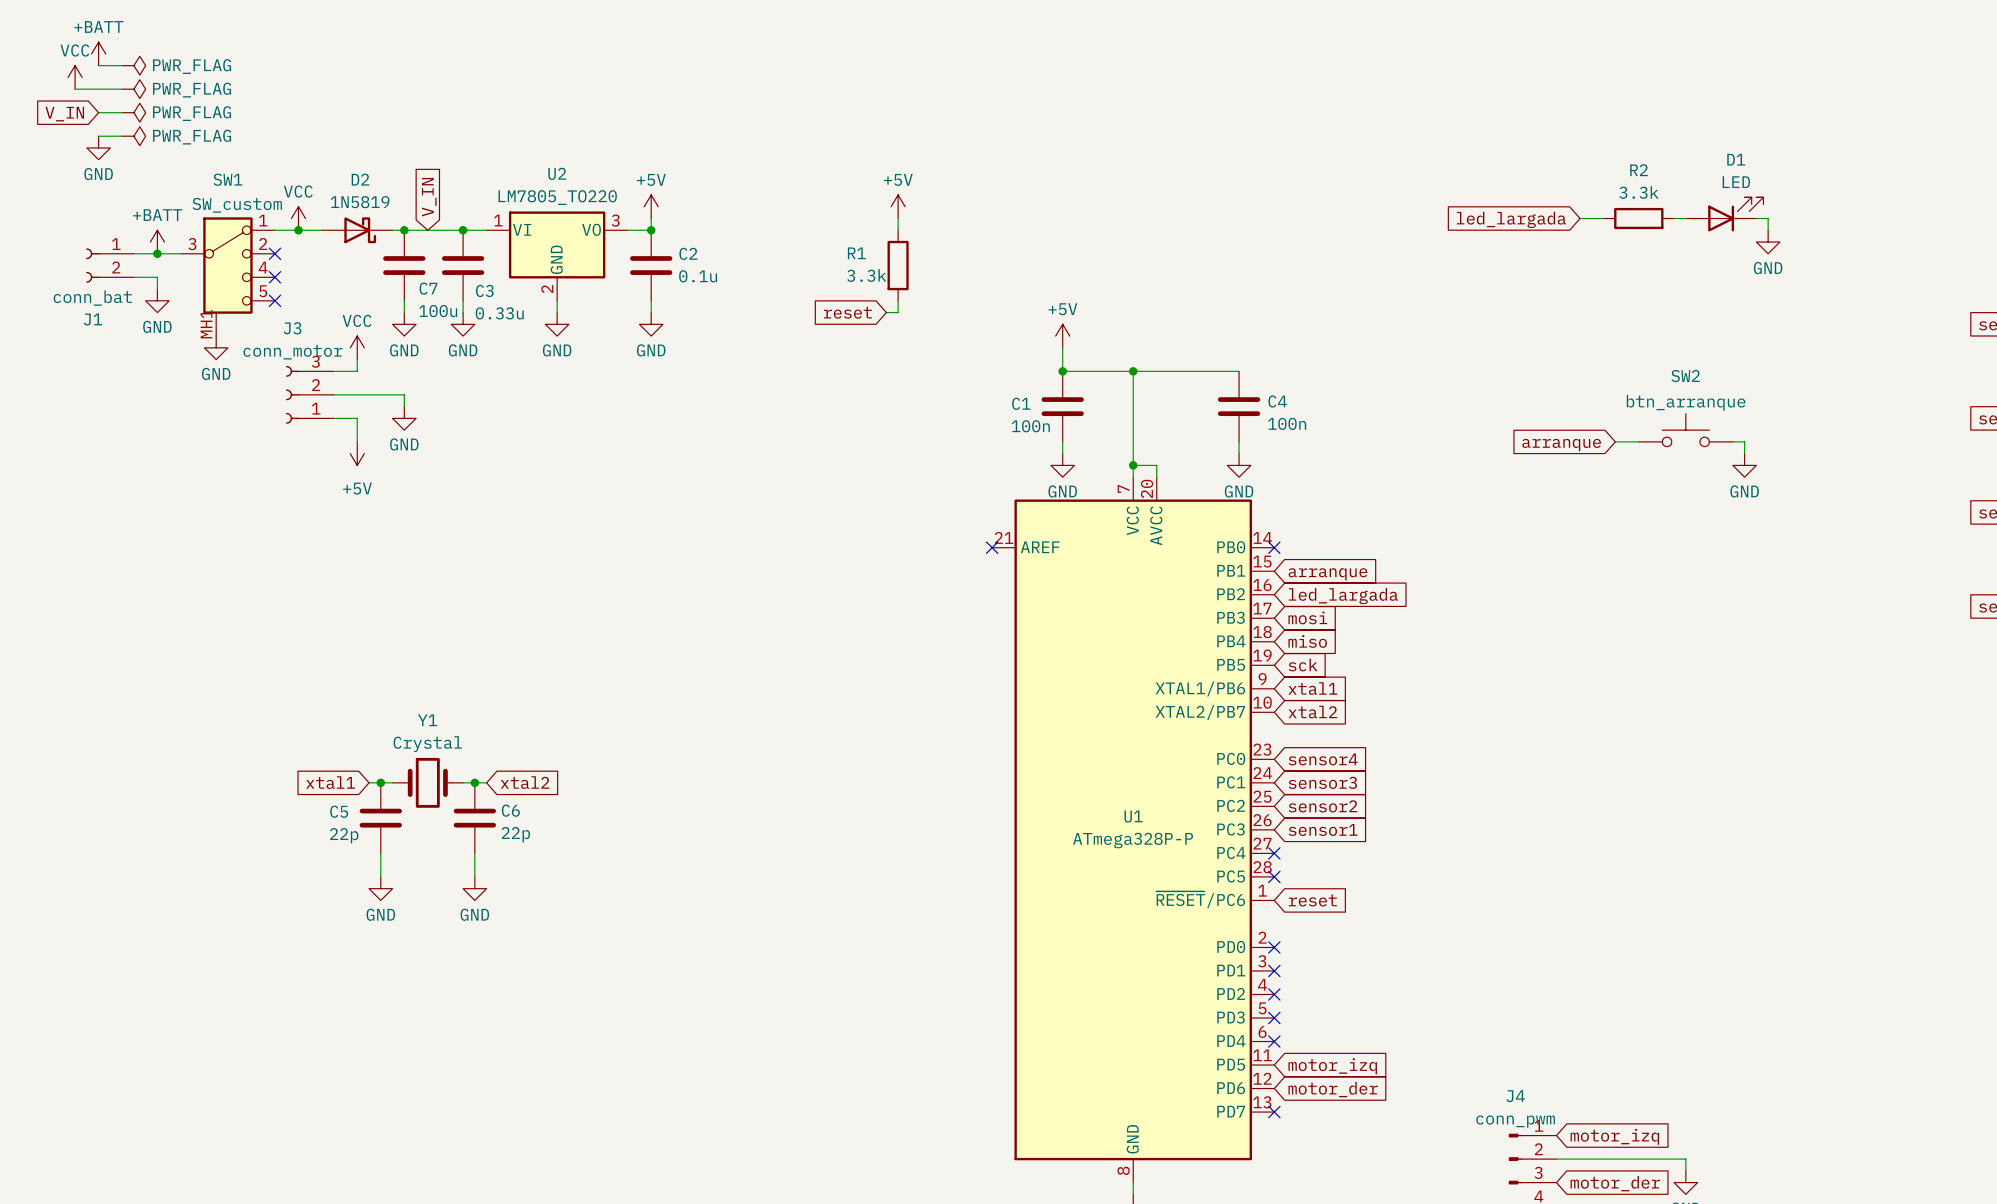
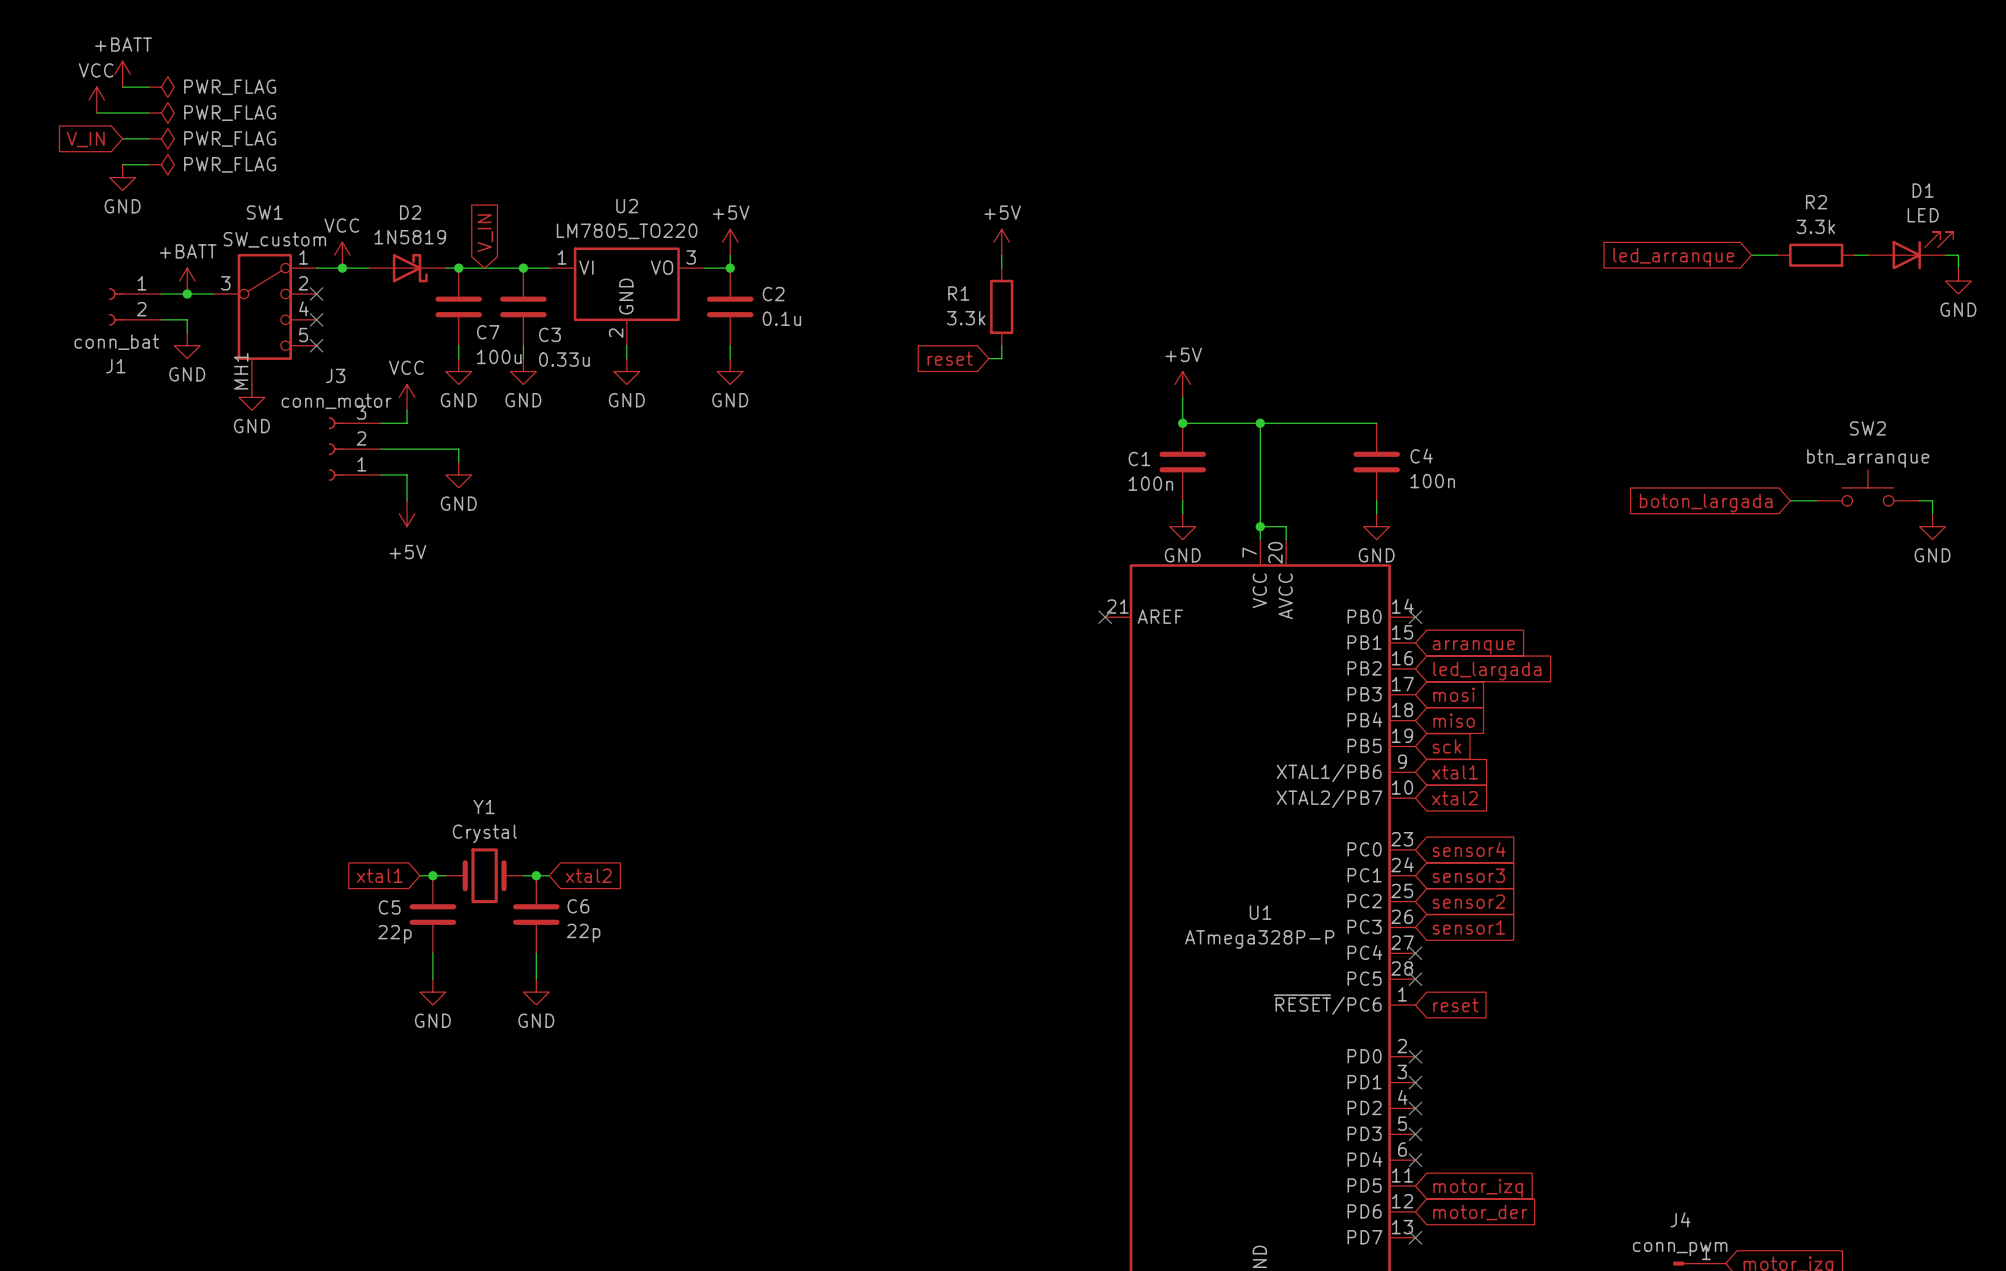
global label: led_largada (1511, 219) -> led_arranque (1673, 257)
global label: arranque (1561, 445) -> boton_largada (1706, 502)

